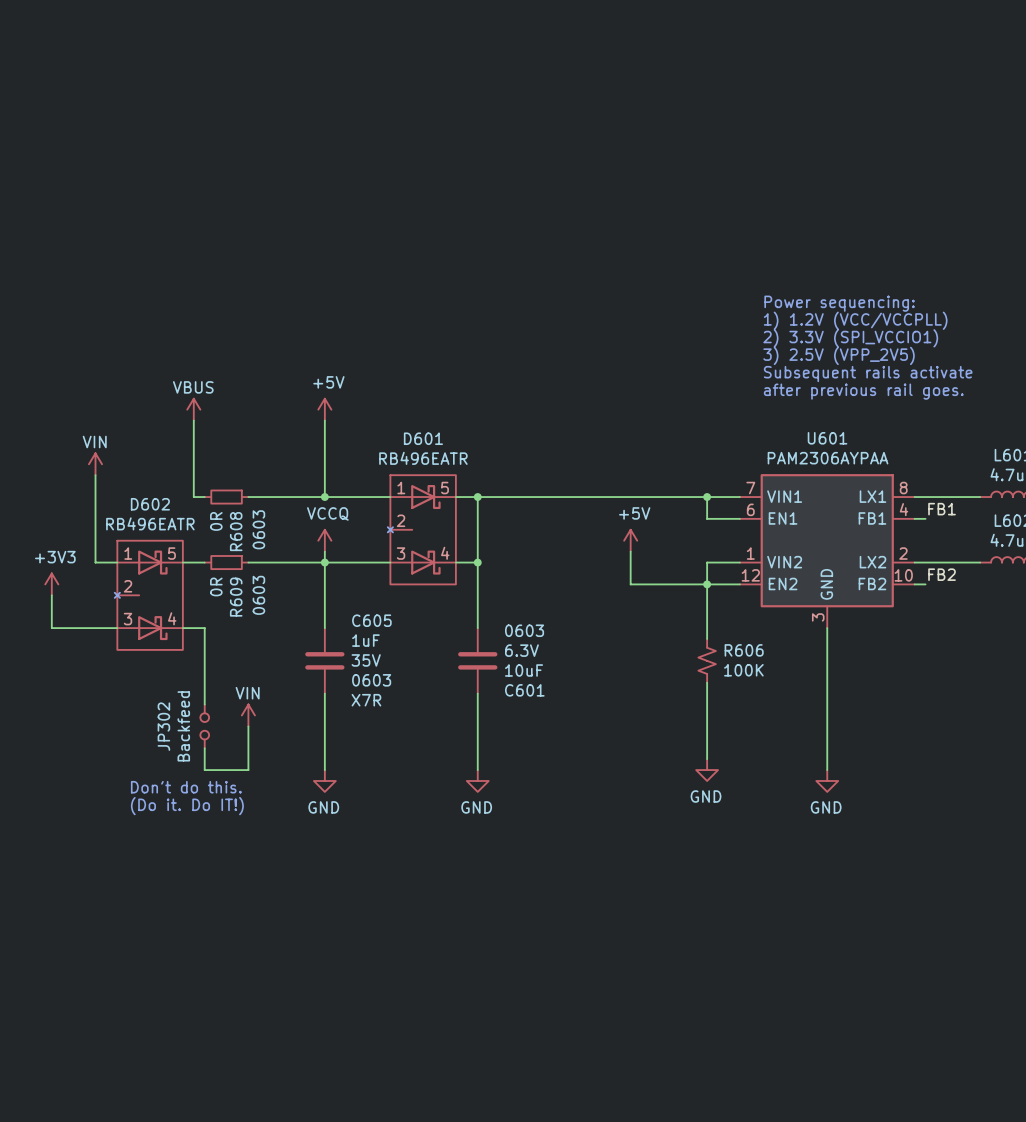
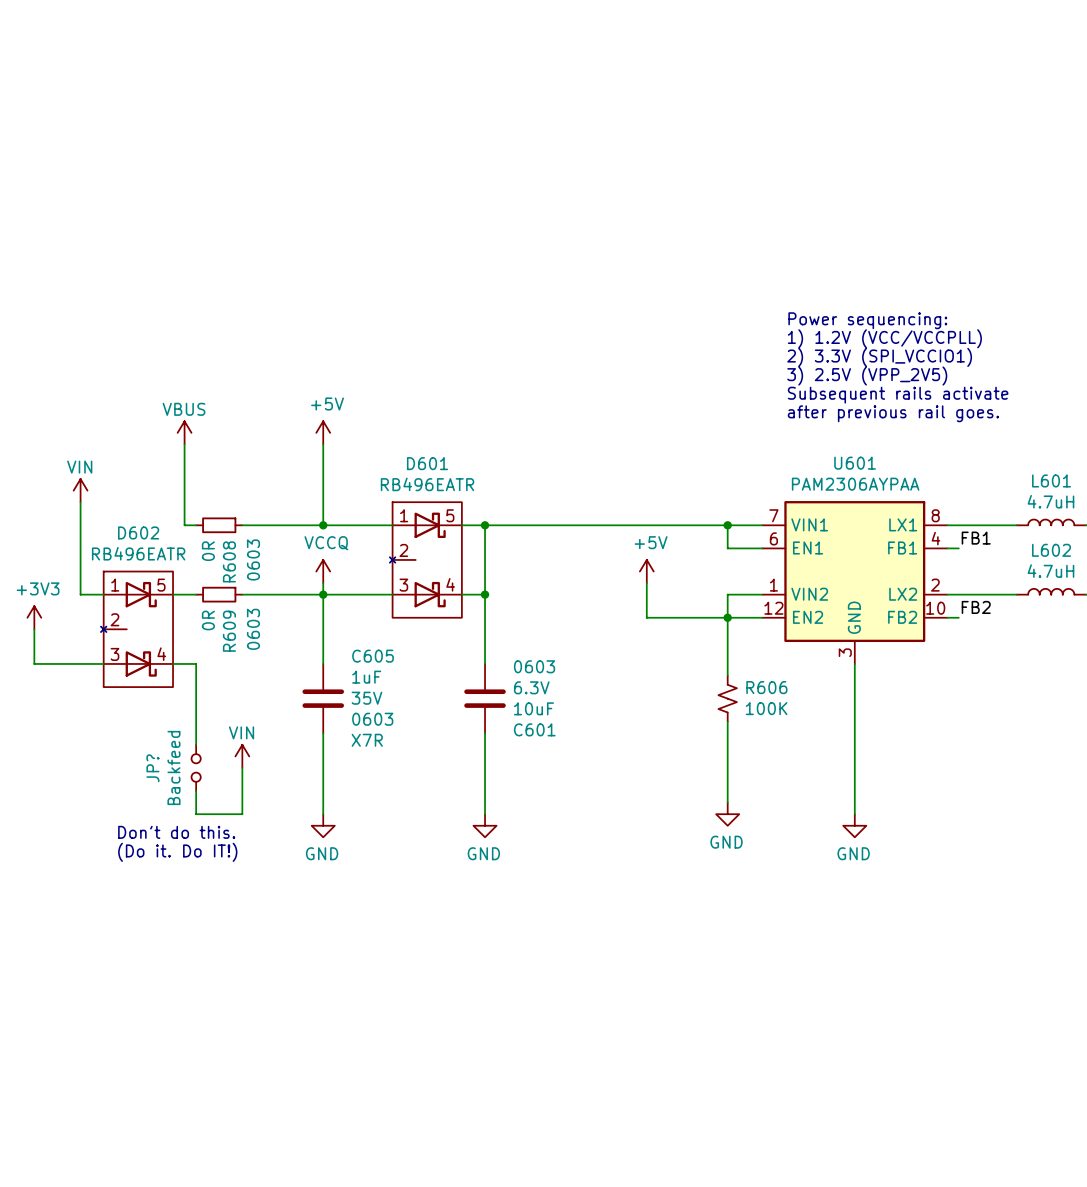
JP302 name: JP302 (163, 726) -> JP? (152, 768)

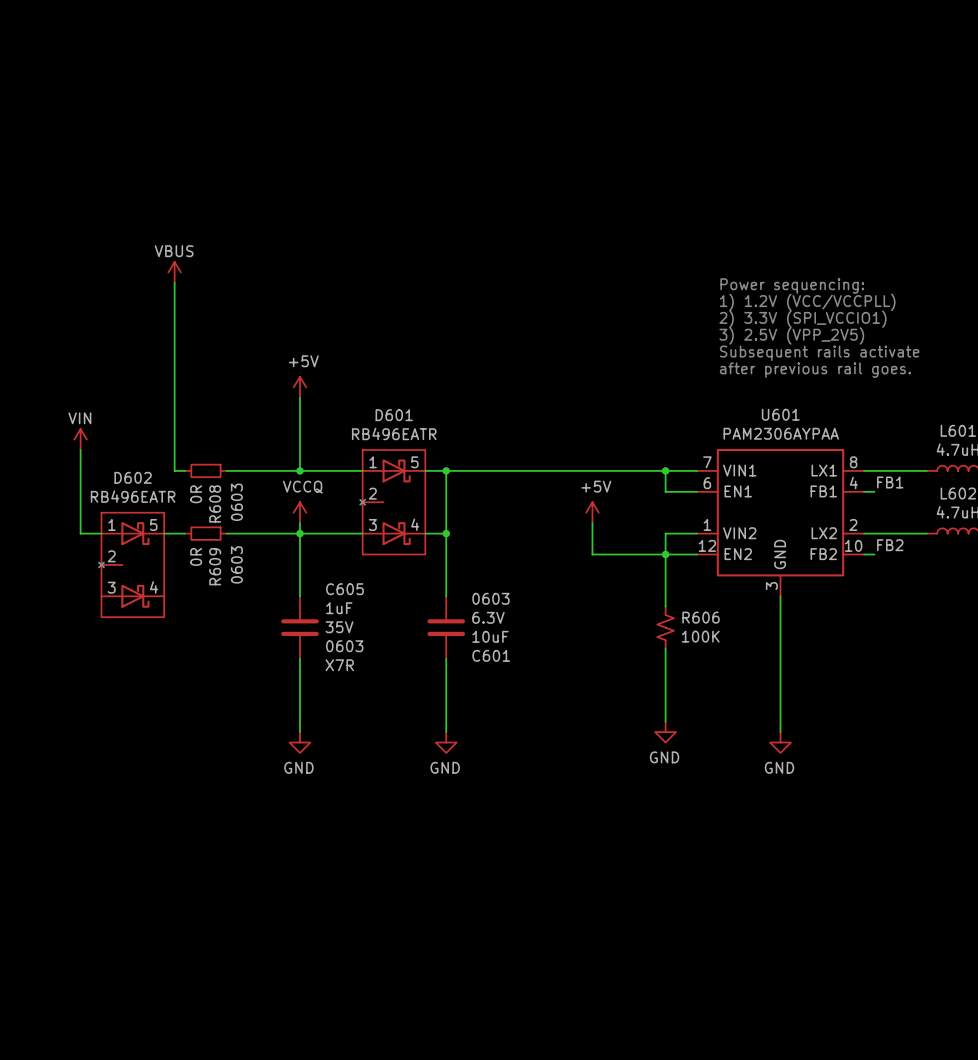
wire: none -> (174, 282) (174, 397)
power symbol position: VBUS (184, 432) -> VBUS (174, 272)
power symbol: +3V3 (34, 617) -> none
wire: (34, 629) (34, 663) (103, 663) -> none
wire: (173, 663) (196, 663) (196, 744) -> none
power symbol: VIN (242, 756) -> none
JP?: Backfeed (196, 767) -> none
wire: (242, 767) (242, 814) (196, 814) (196, 791) -> none
text: Don't do this. (176, 832) -> none
text: (Do it. Do IT!) (177, 852) -> none

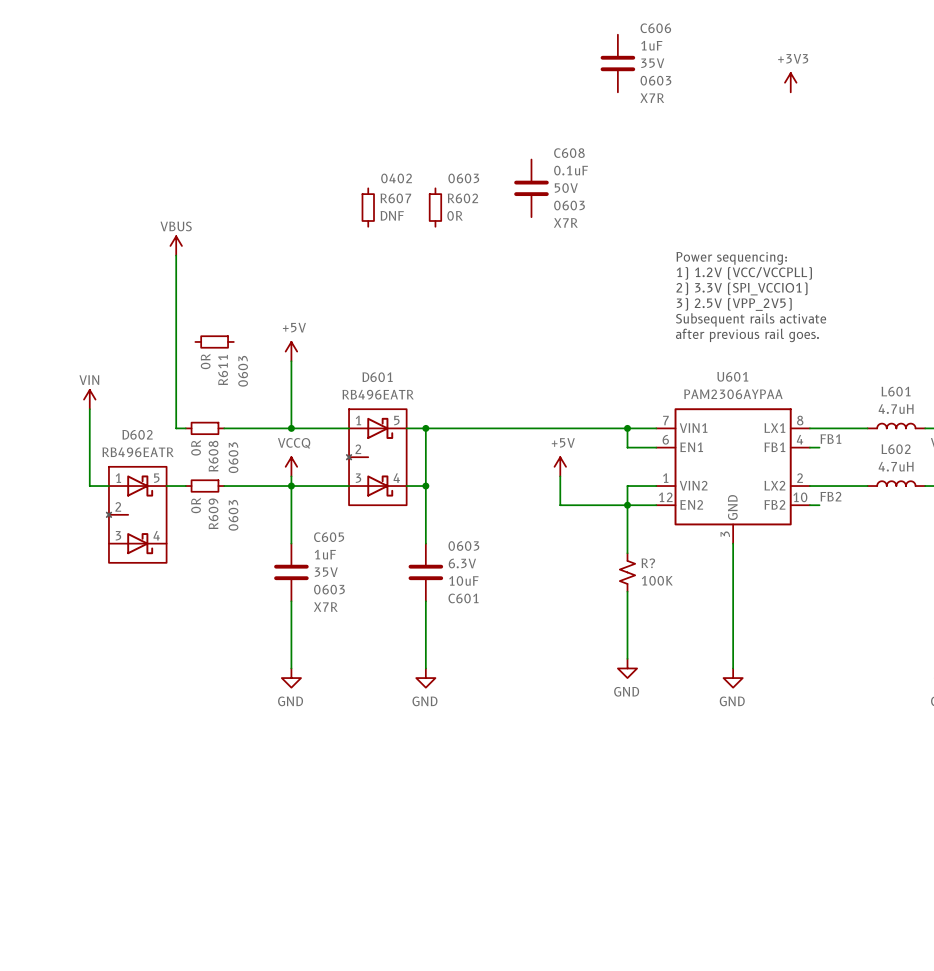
C606: none -> 1uF (617, 63)
power symbol: none -> +3V3 (790, 82)
C608: none -> 0.1uF (531, 188)
R607: none -> DNF (368, 207)
R602: none -> 0R (435, 207)
R611: none -> 0R (214, 341)
R606 name: R606 (701, 617) -> R? (648, 563)

